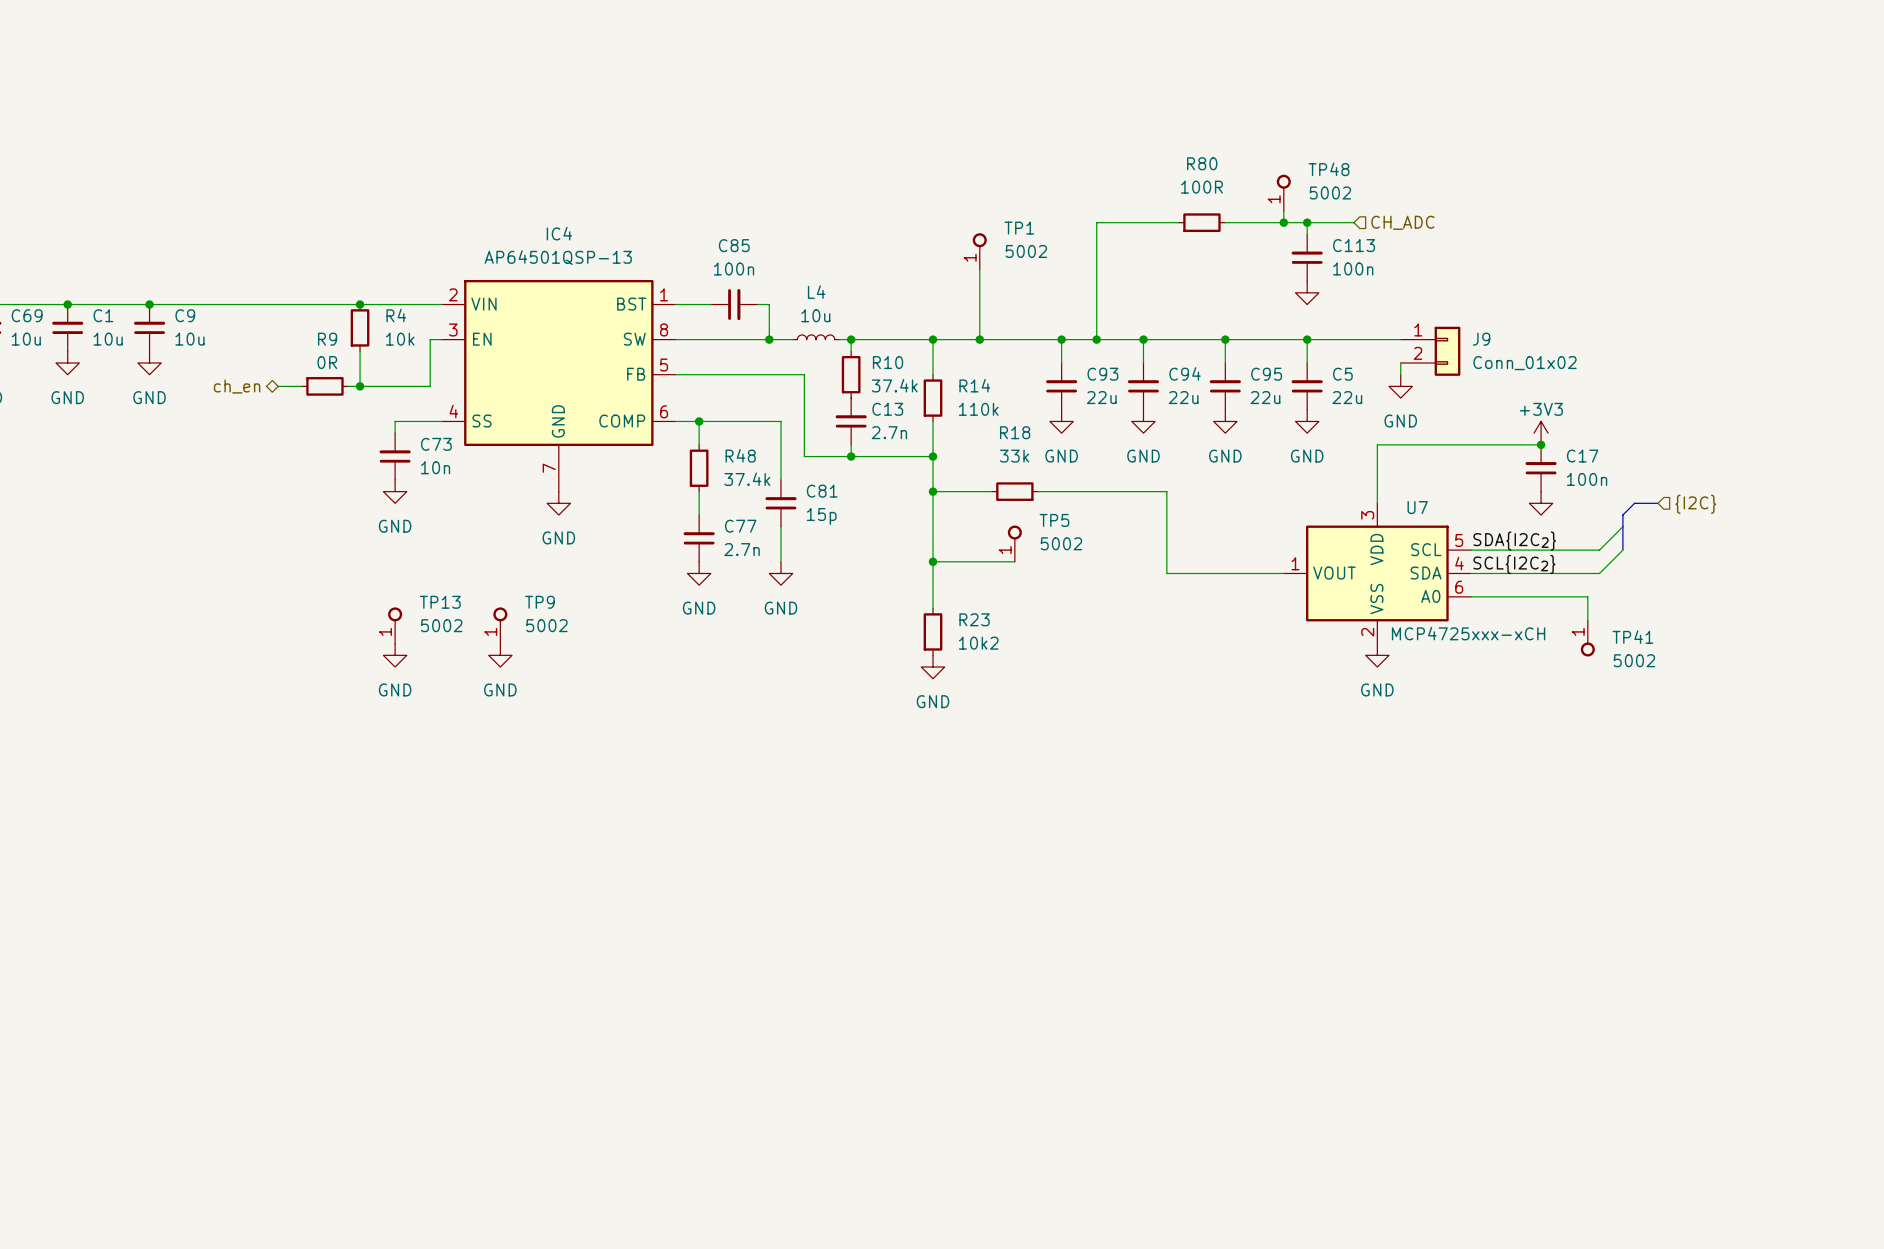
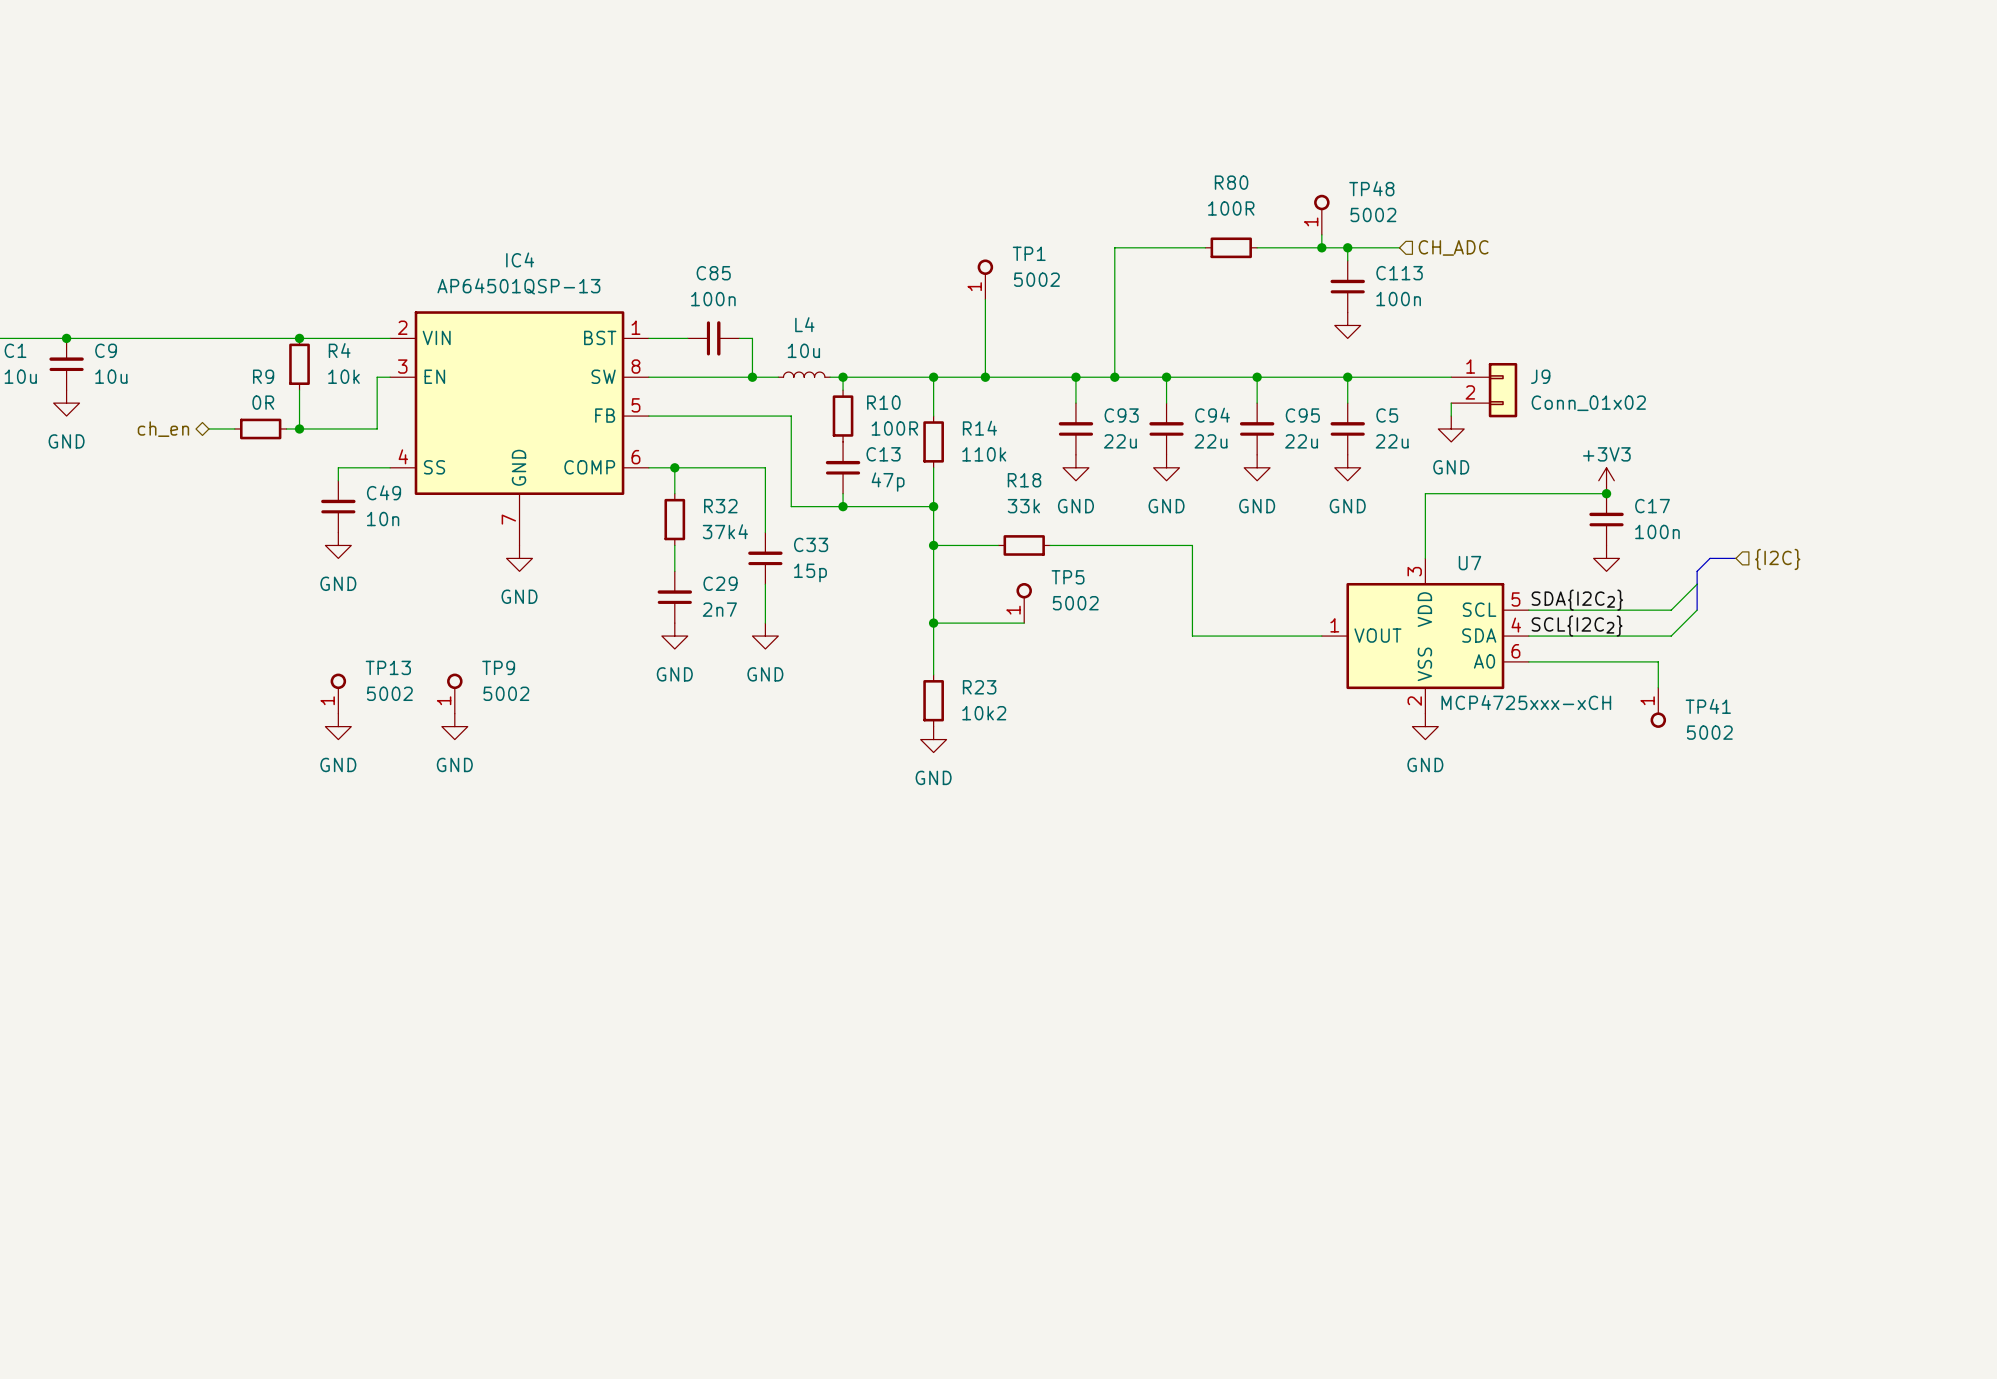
R10 text: 37.4k (894, 385) -> 100R (894, 428)
C13 text: 2.7n (889, 432) -> 47p (888, 482)
C73 name: C73 (436, 444) -> C49 (384, 492)
R48 name: R48 (740, 455) -> R32 (720, 506)
R48 text: 37.4k (747, 479) -> 37k4 (725, 531)
C81 name: C81 (822, 491) -> C33 (811, 544)
C77 name: C77 (740, 526) -> C29 (720, 583)
C77 text: 2.7n (742, 549) -> 2n7 (719, 609)

